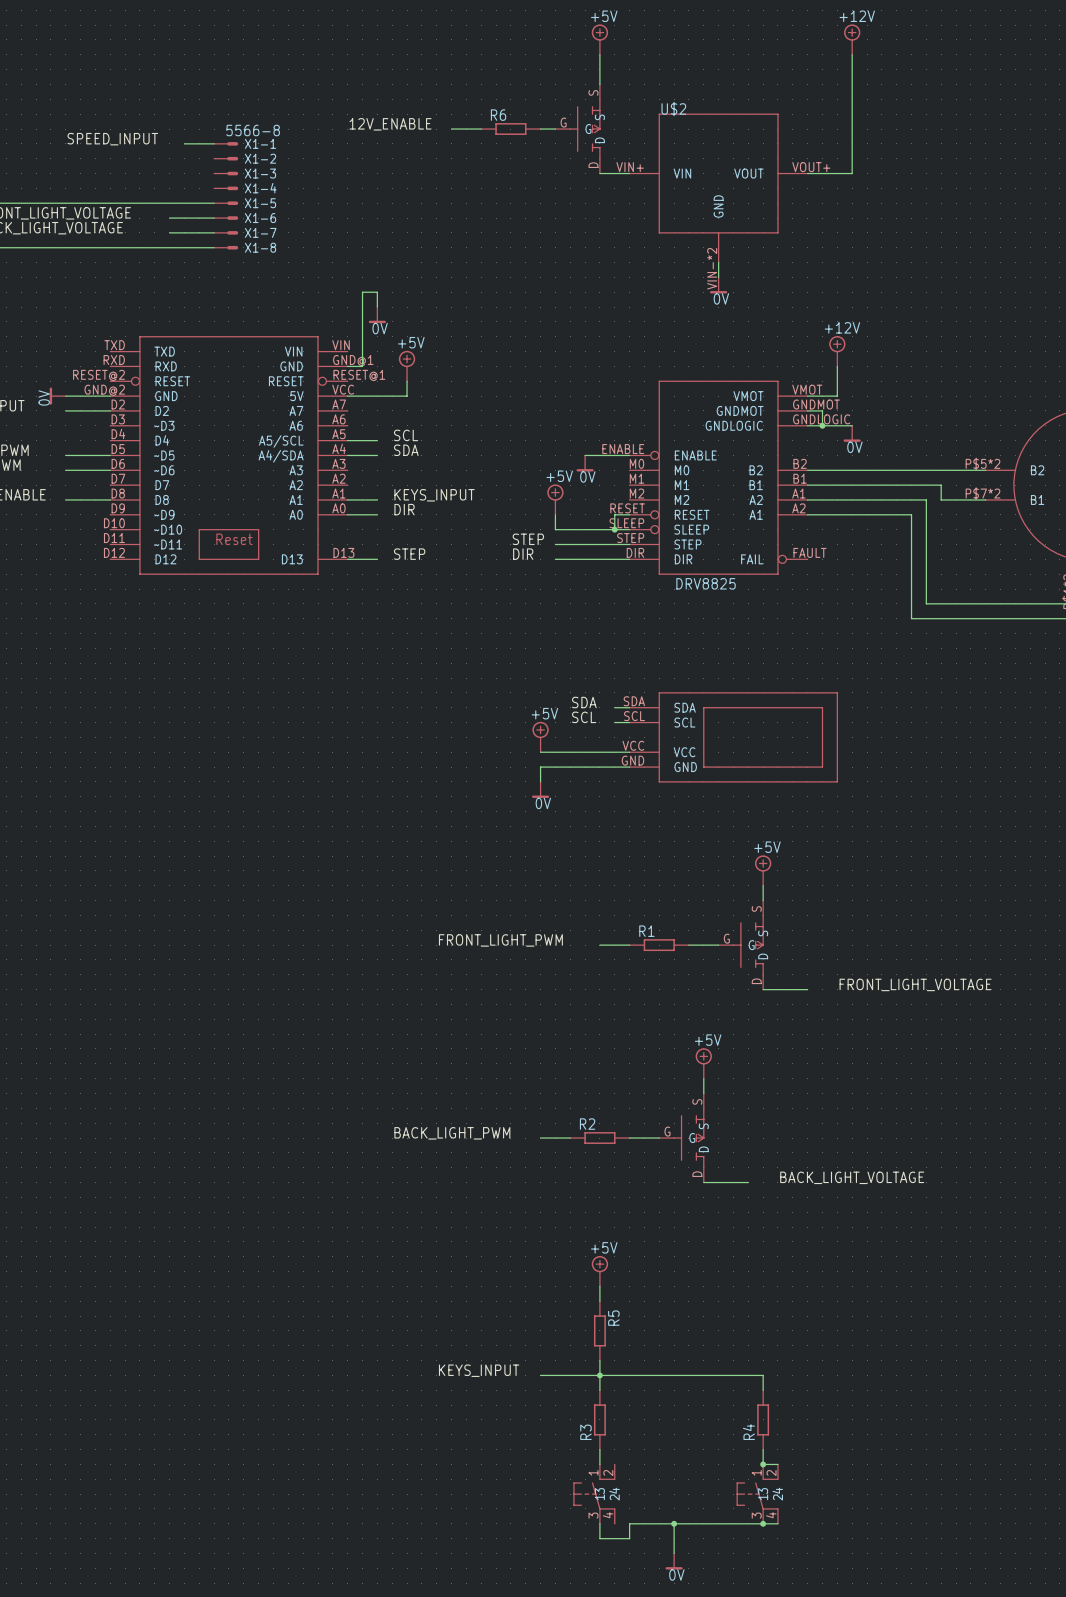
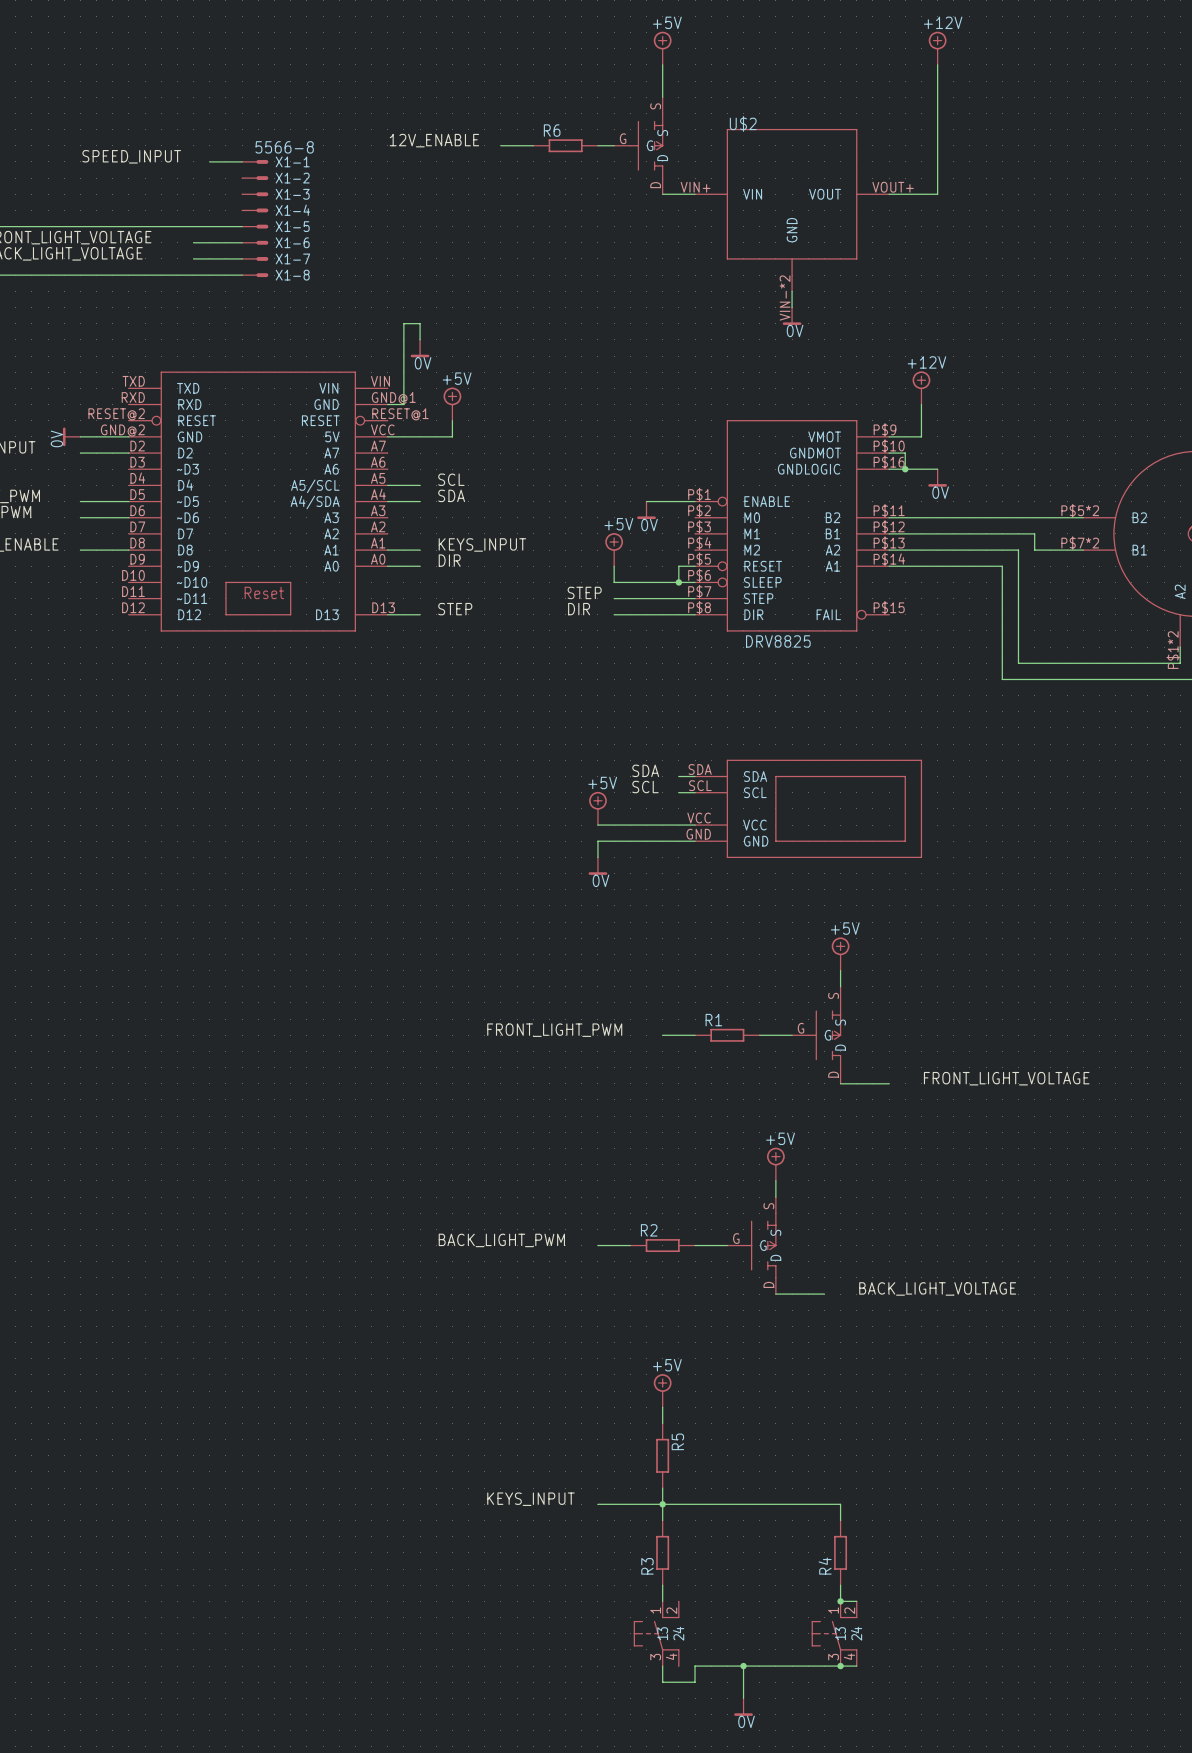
DRV8825 symbol: [629, 380, 808, 575] -> [695, 420, 890, 632]

